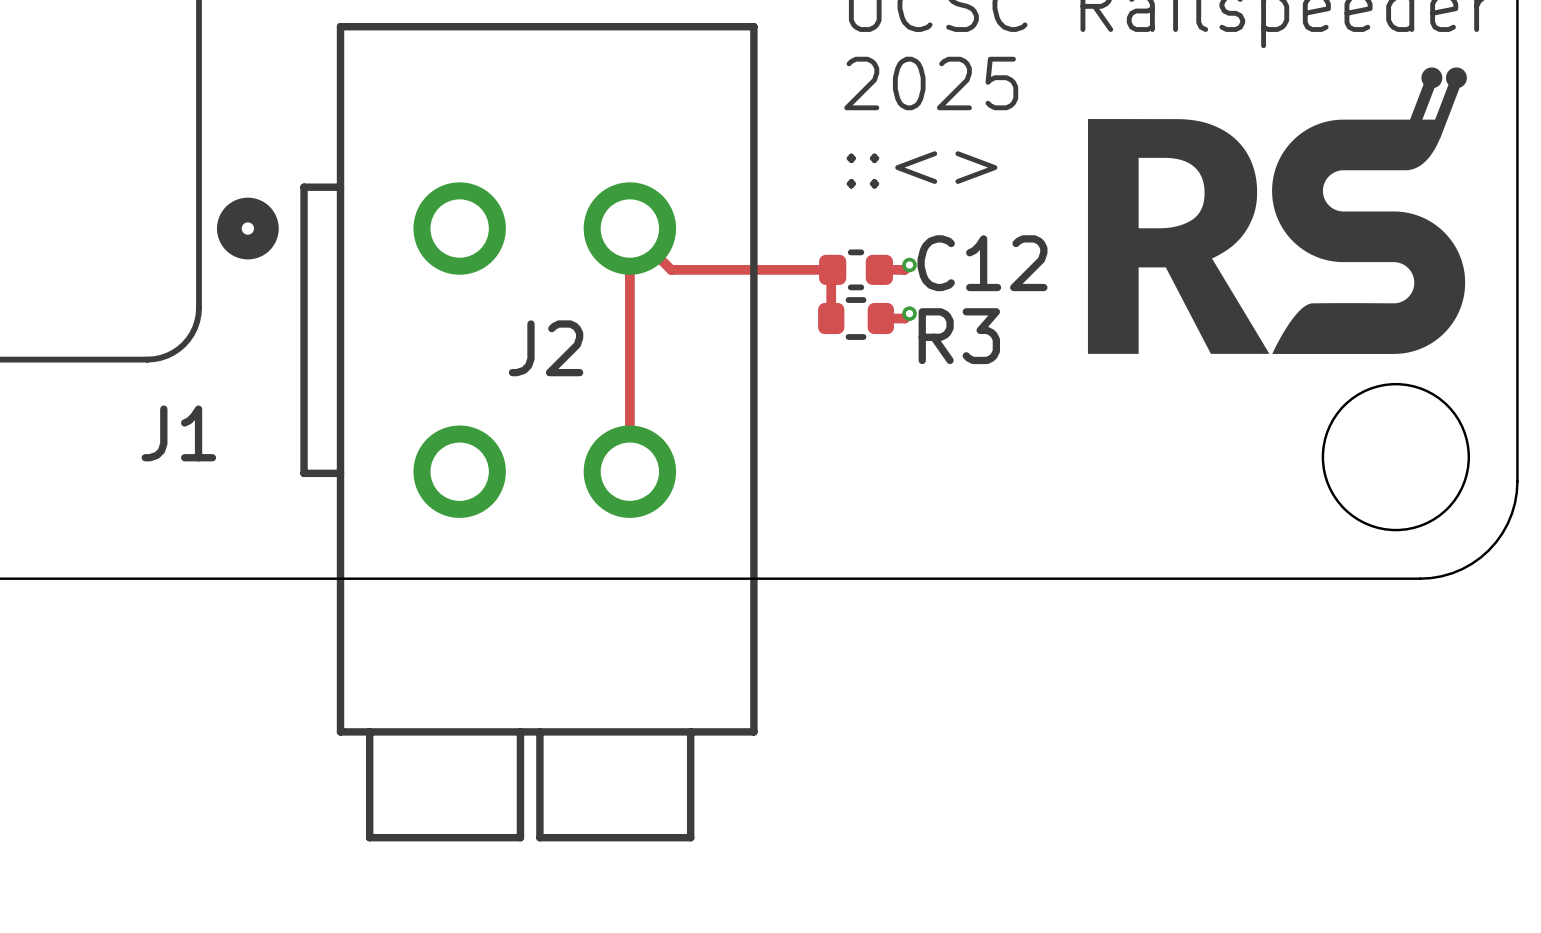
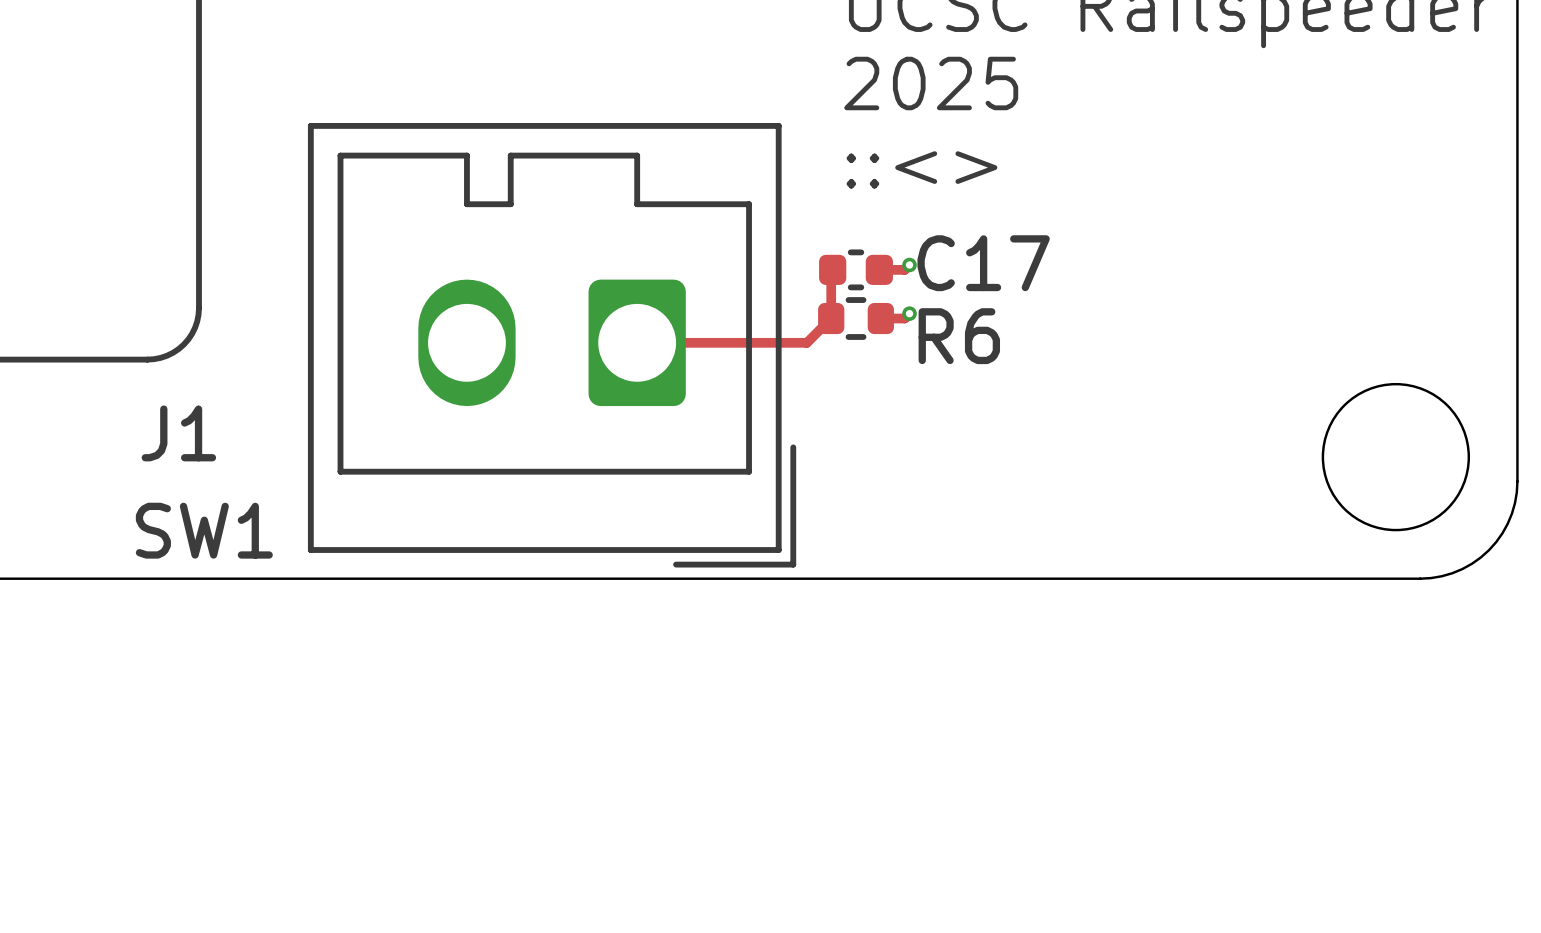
drawing: [1087, 67, 1467, 354] -> none
C12 name: C12 (982, 263) -> C17 (983, 263)
track: (832, 269) (671, 269) (629, 228) (629, 471) -> none
track: none -> (831, 318) (806, 342) (637, 342)
R3 name: R3 (959, 336) -> R6 (959, 336)
SW1: none -> (552, 345)
J2: (487, 432) -> none

